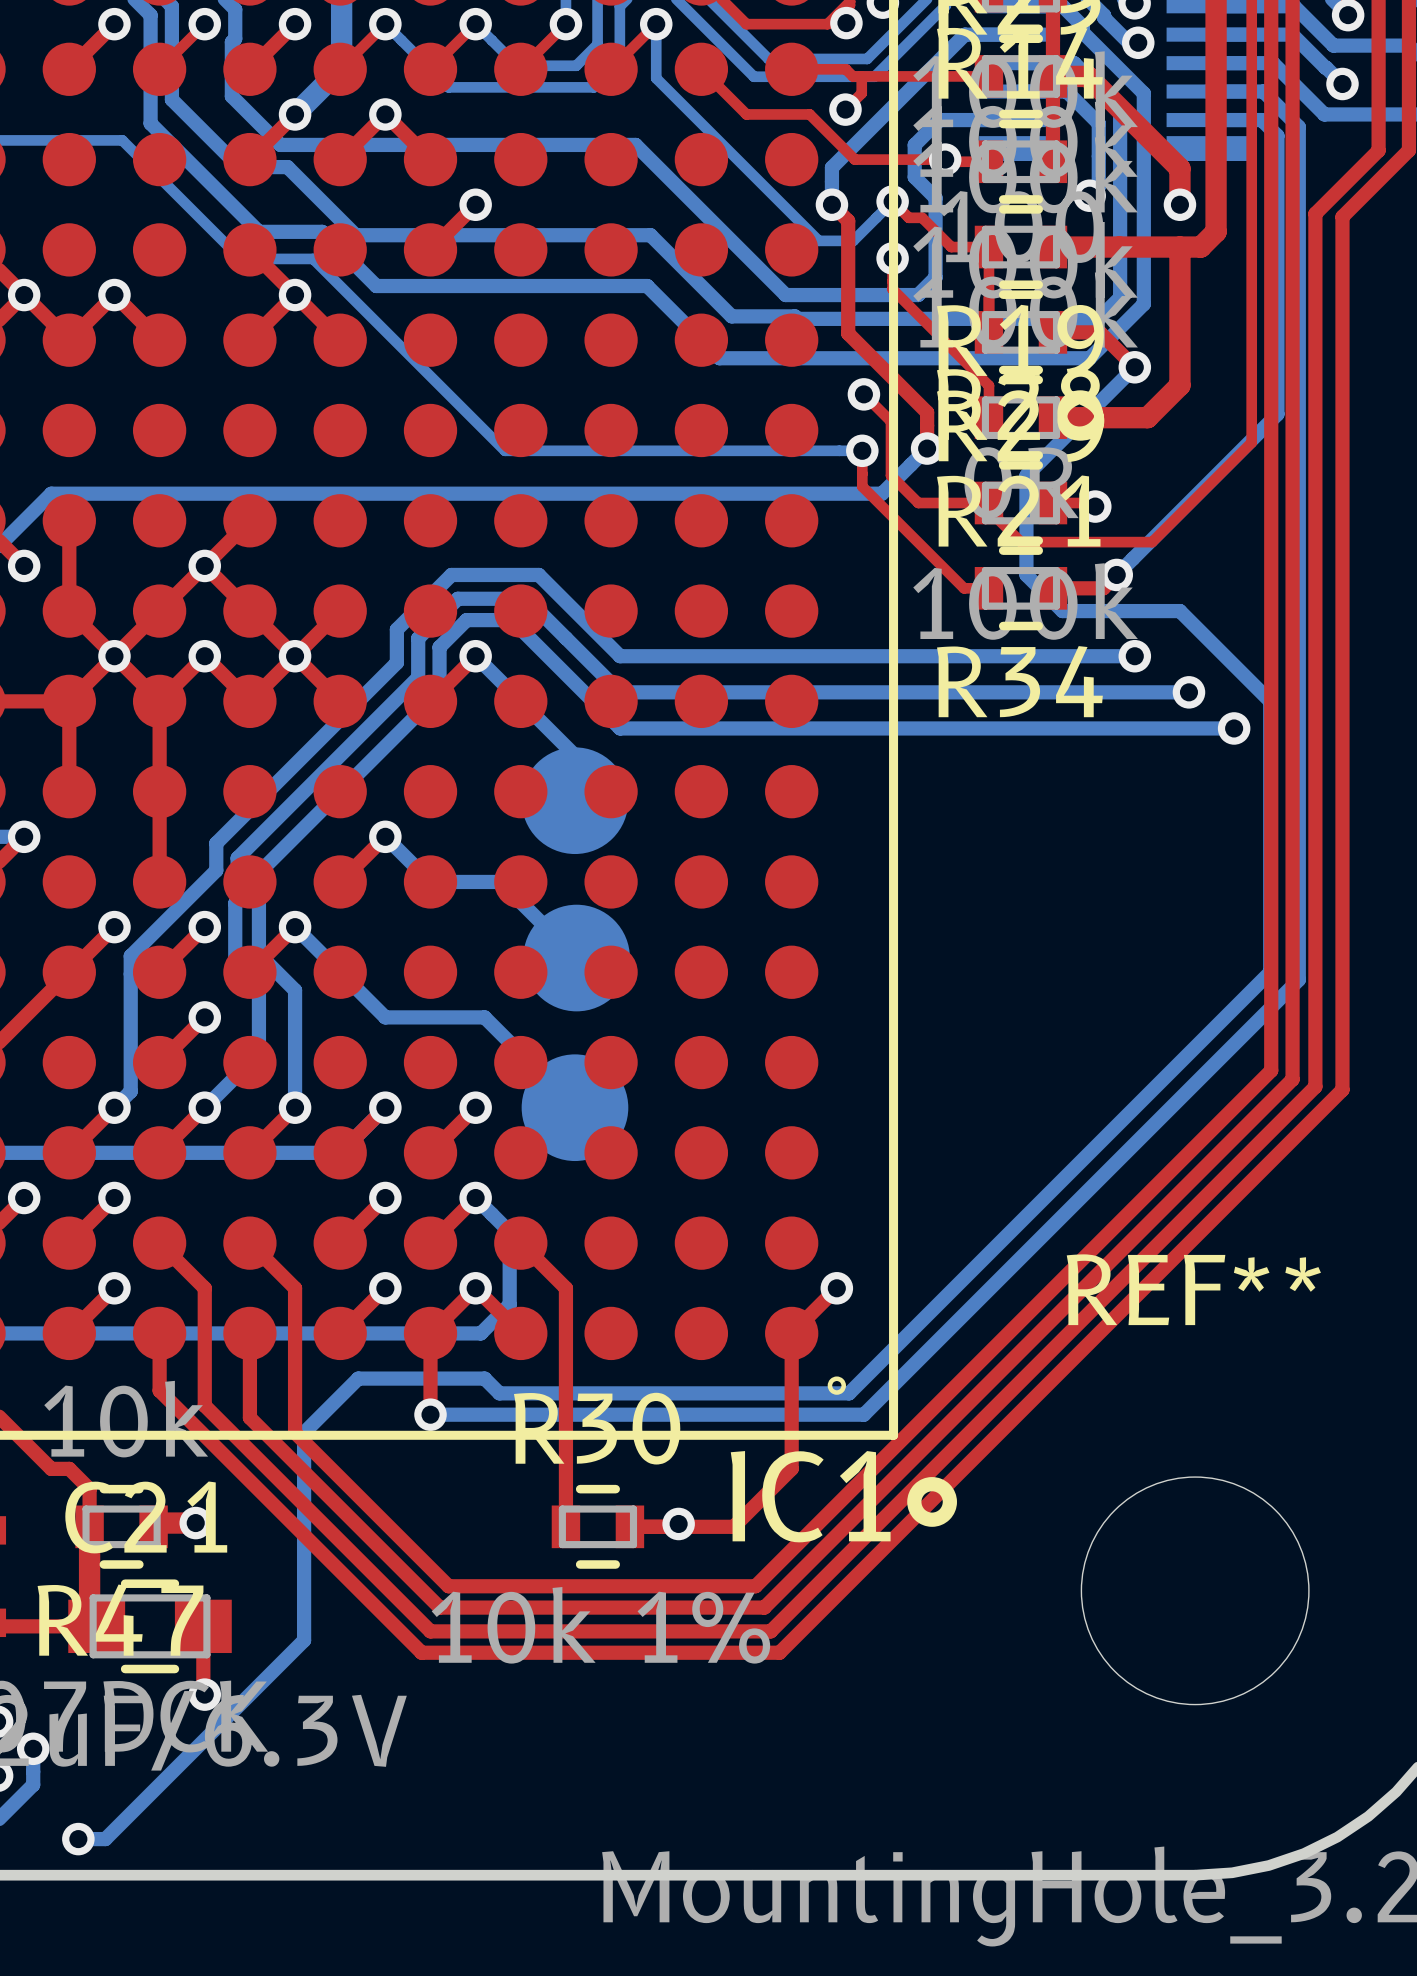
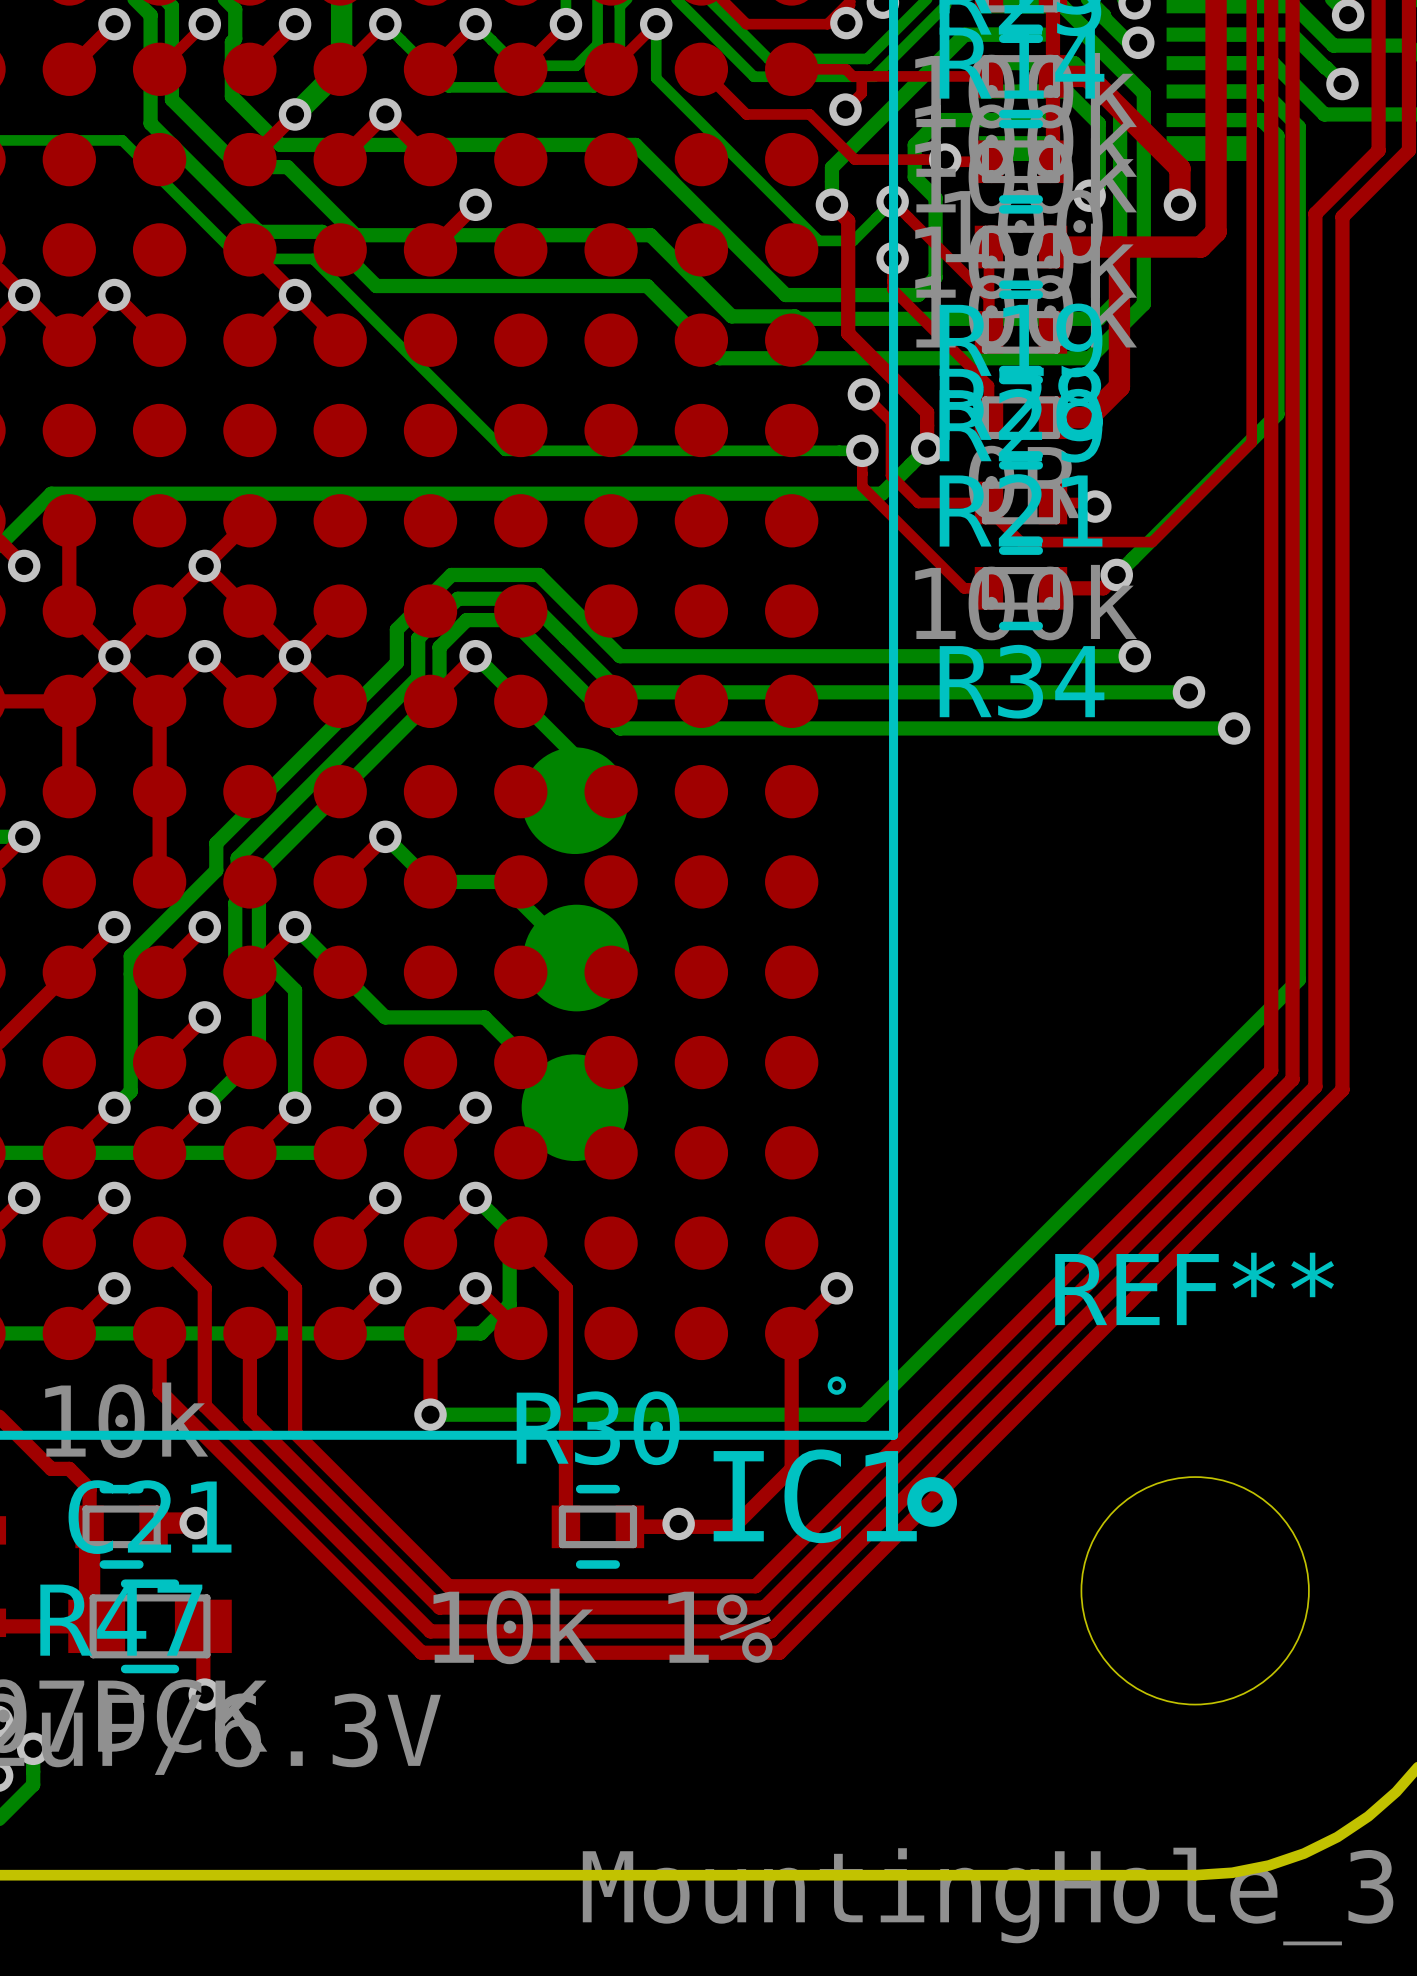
top track: (908, 217) (922, 217) (951, 247) (988, 247) -> (908, 217) (988, 297)
top track: (1179, 247) (1179, 385) (1147, 417) (1088, 417) -> (1119, 247) (1119, 386) (1088, 417)
top track: (1052, 332) (1099, 332) (1134, 367) -> none
bottom track: (1134, 367) (1026, 475) (1026, 574) (1062, 611) (1179, 611) (1270, 701) (1270, 972) (849, 1393) (499, 1393) (484, 1378) (358, 1378) (304, 1432) (304, 1640) (105, 1839) (78, 1839) -> none
via: (1134, 367) -> none
via: (78, 1839) -> none

